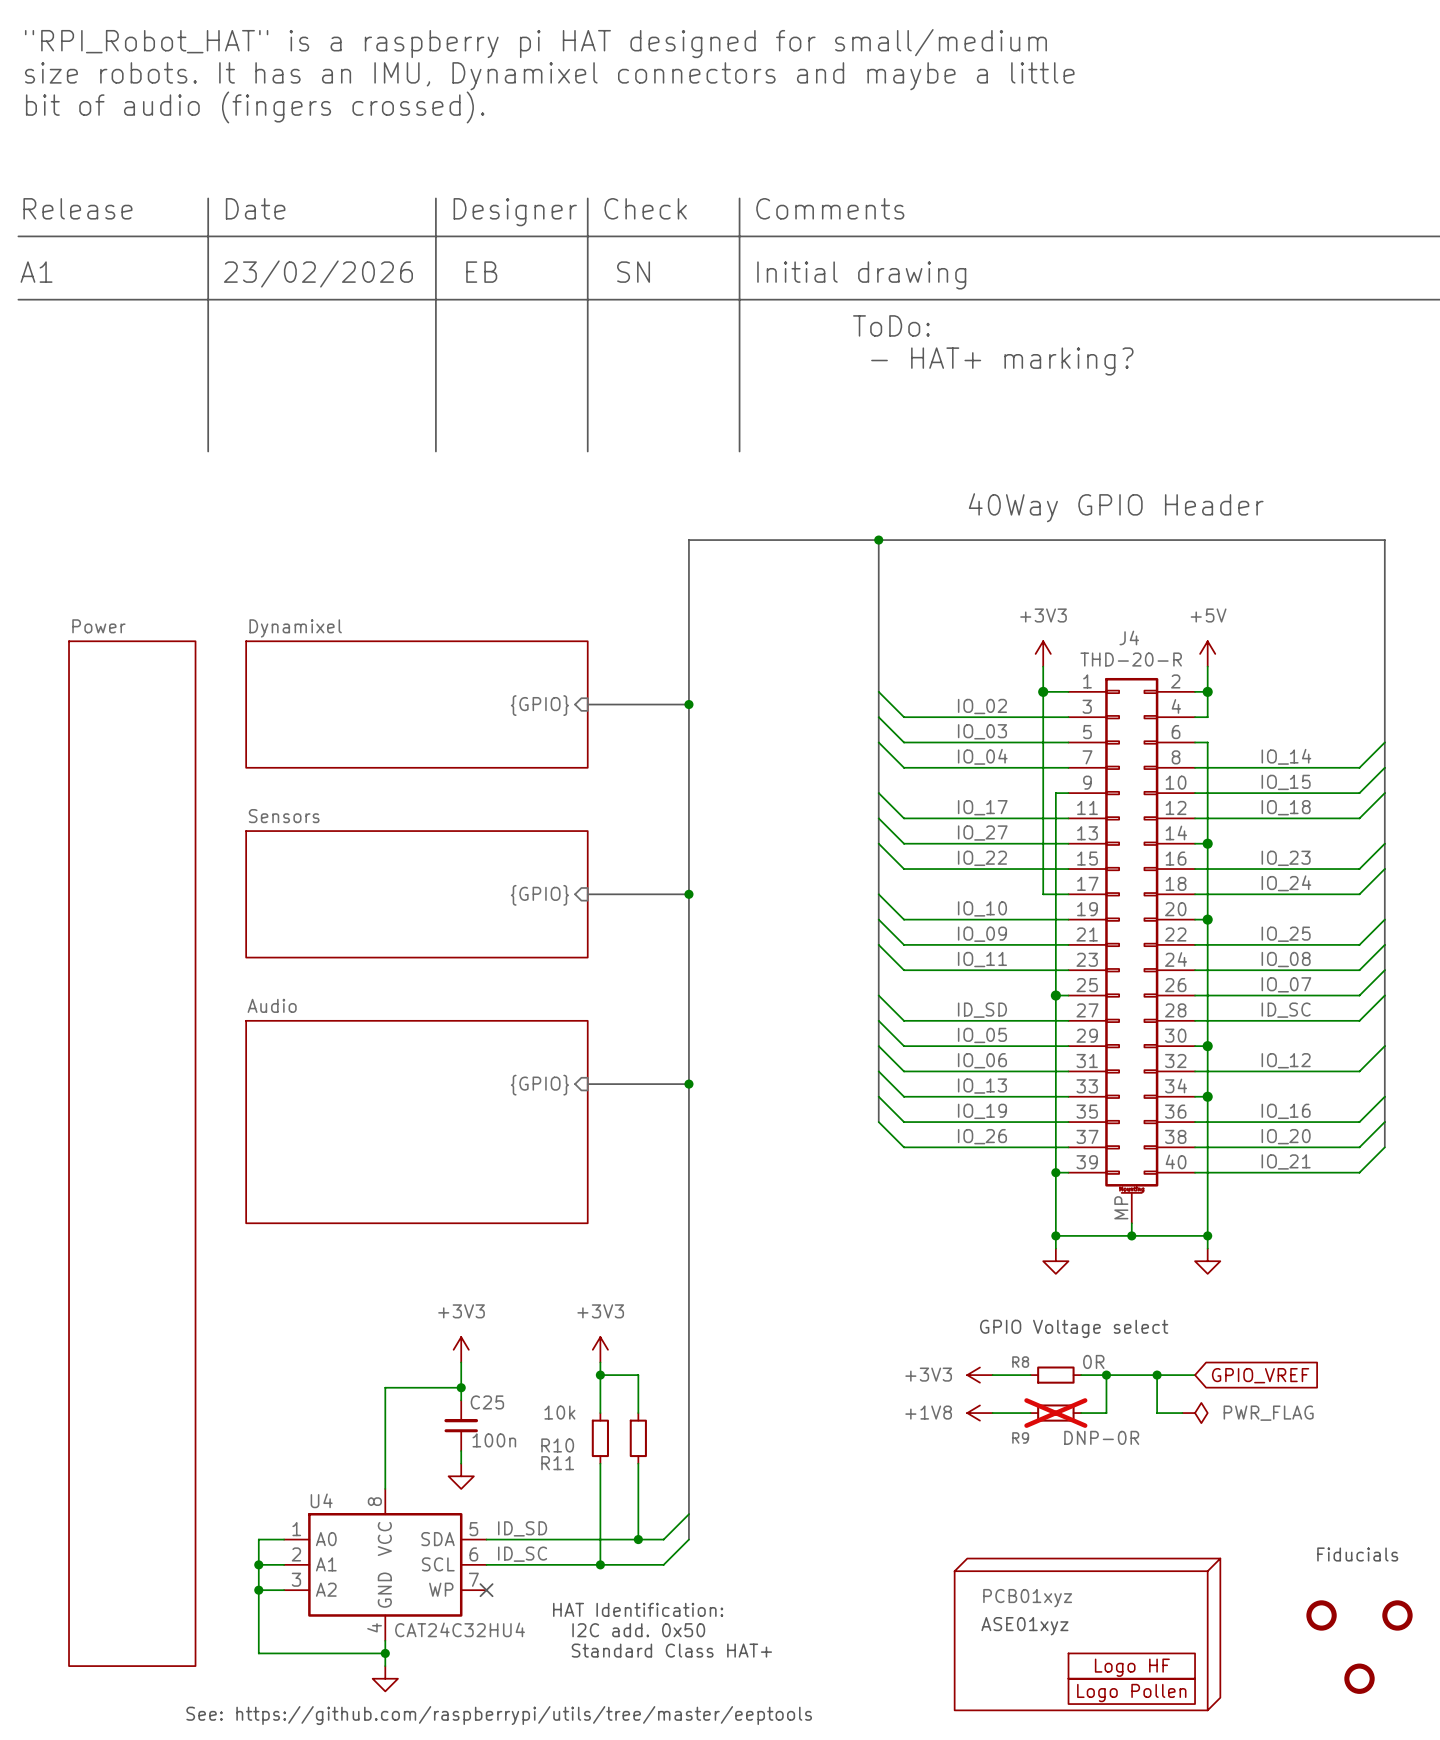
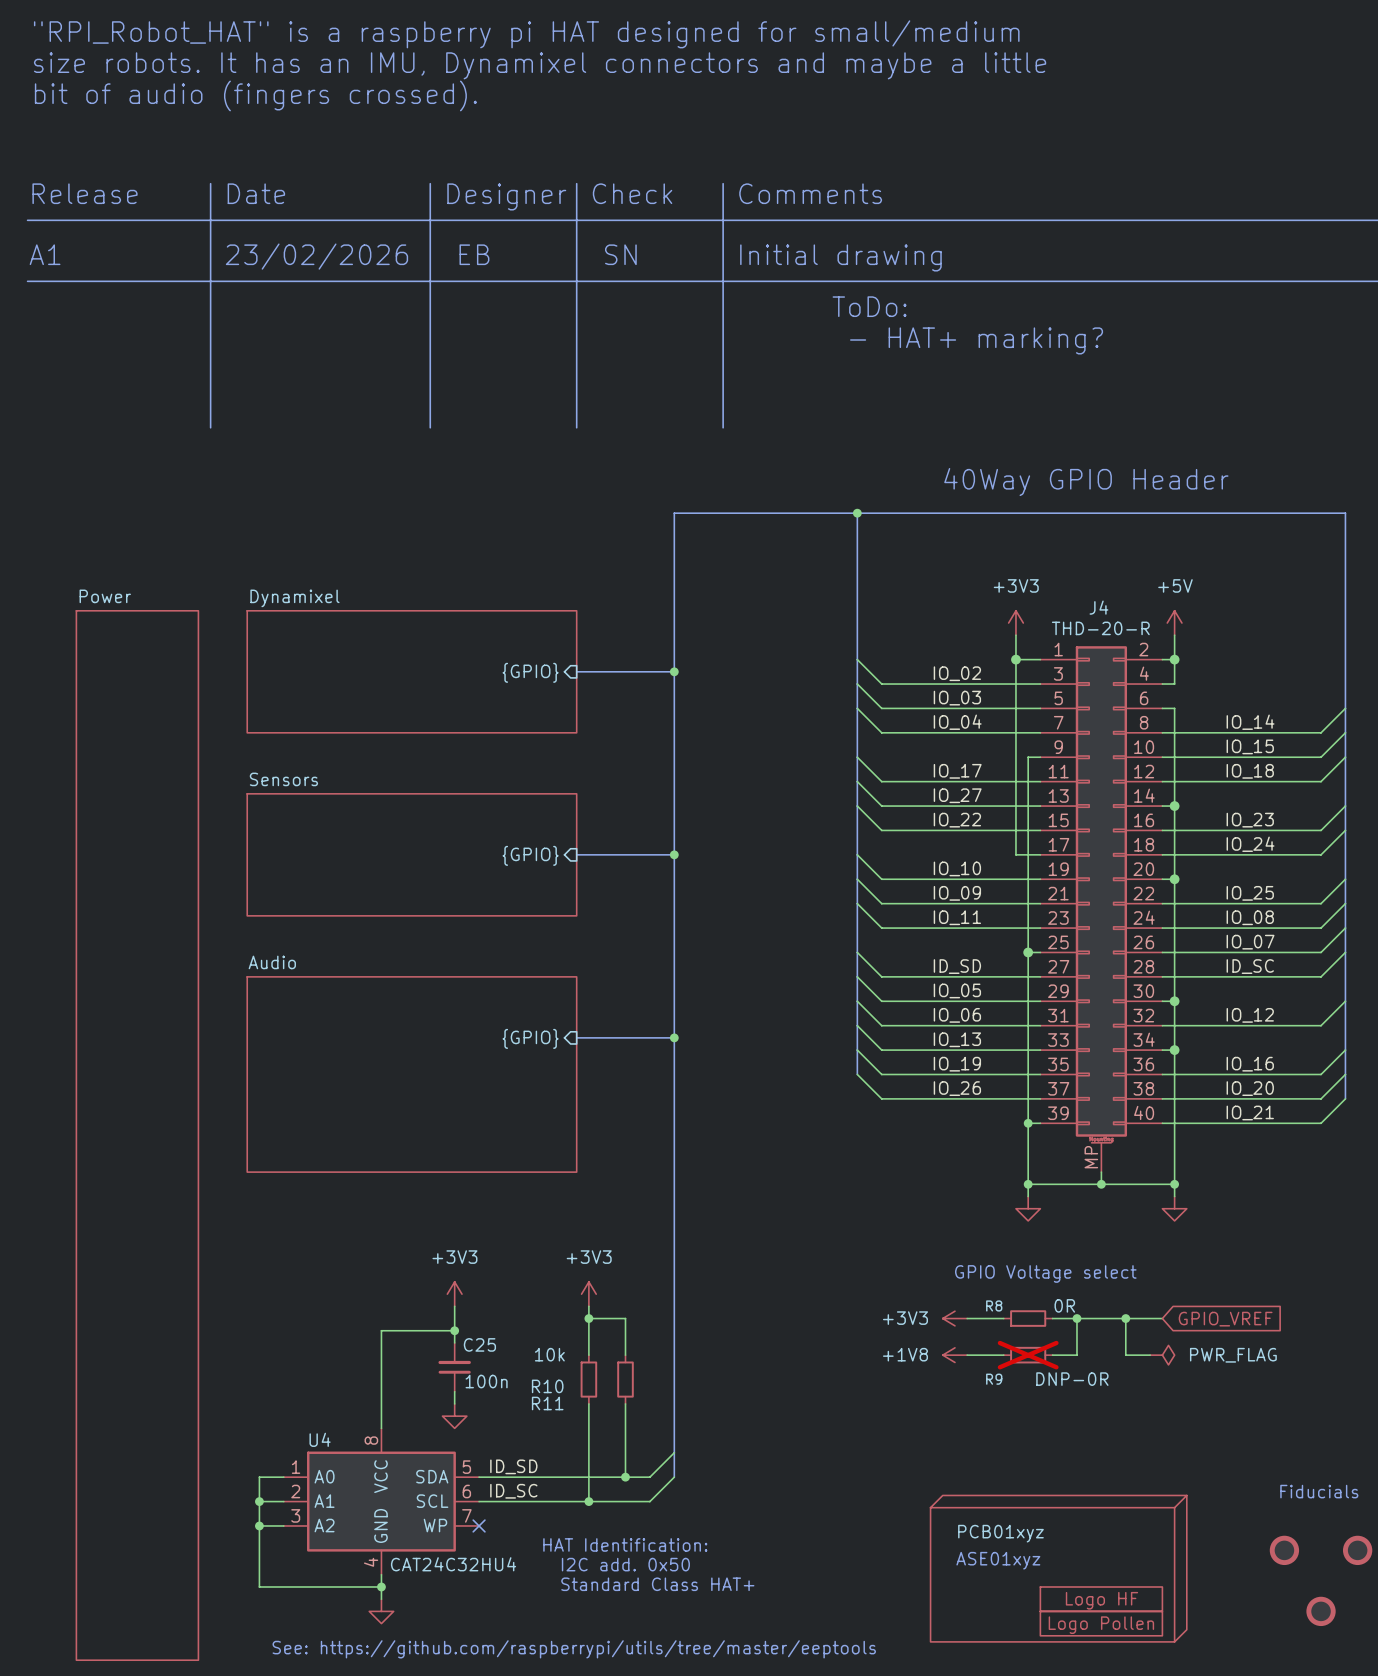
sheet Power: (132, 1153) -> none
sheet Power: none -> (137, 1135)
text position: See: https://github.com/raspberrypi/utils/tree/master/eeptools (499, 1715) -> See: https://github.com/raspberrypi/utils/tree/master/eeptools (574, 1649)

